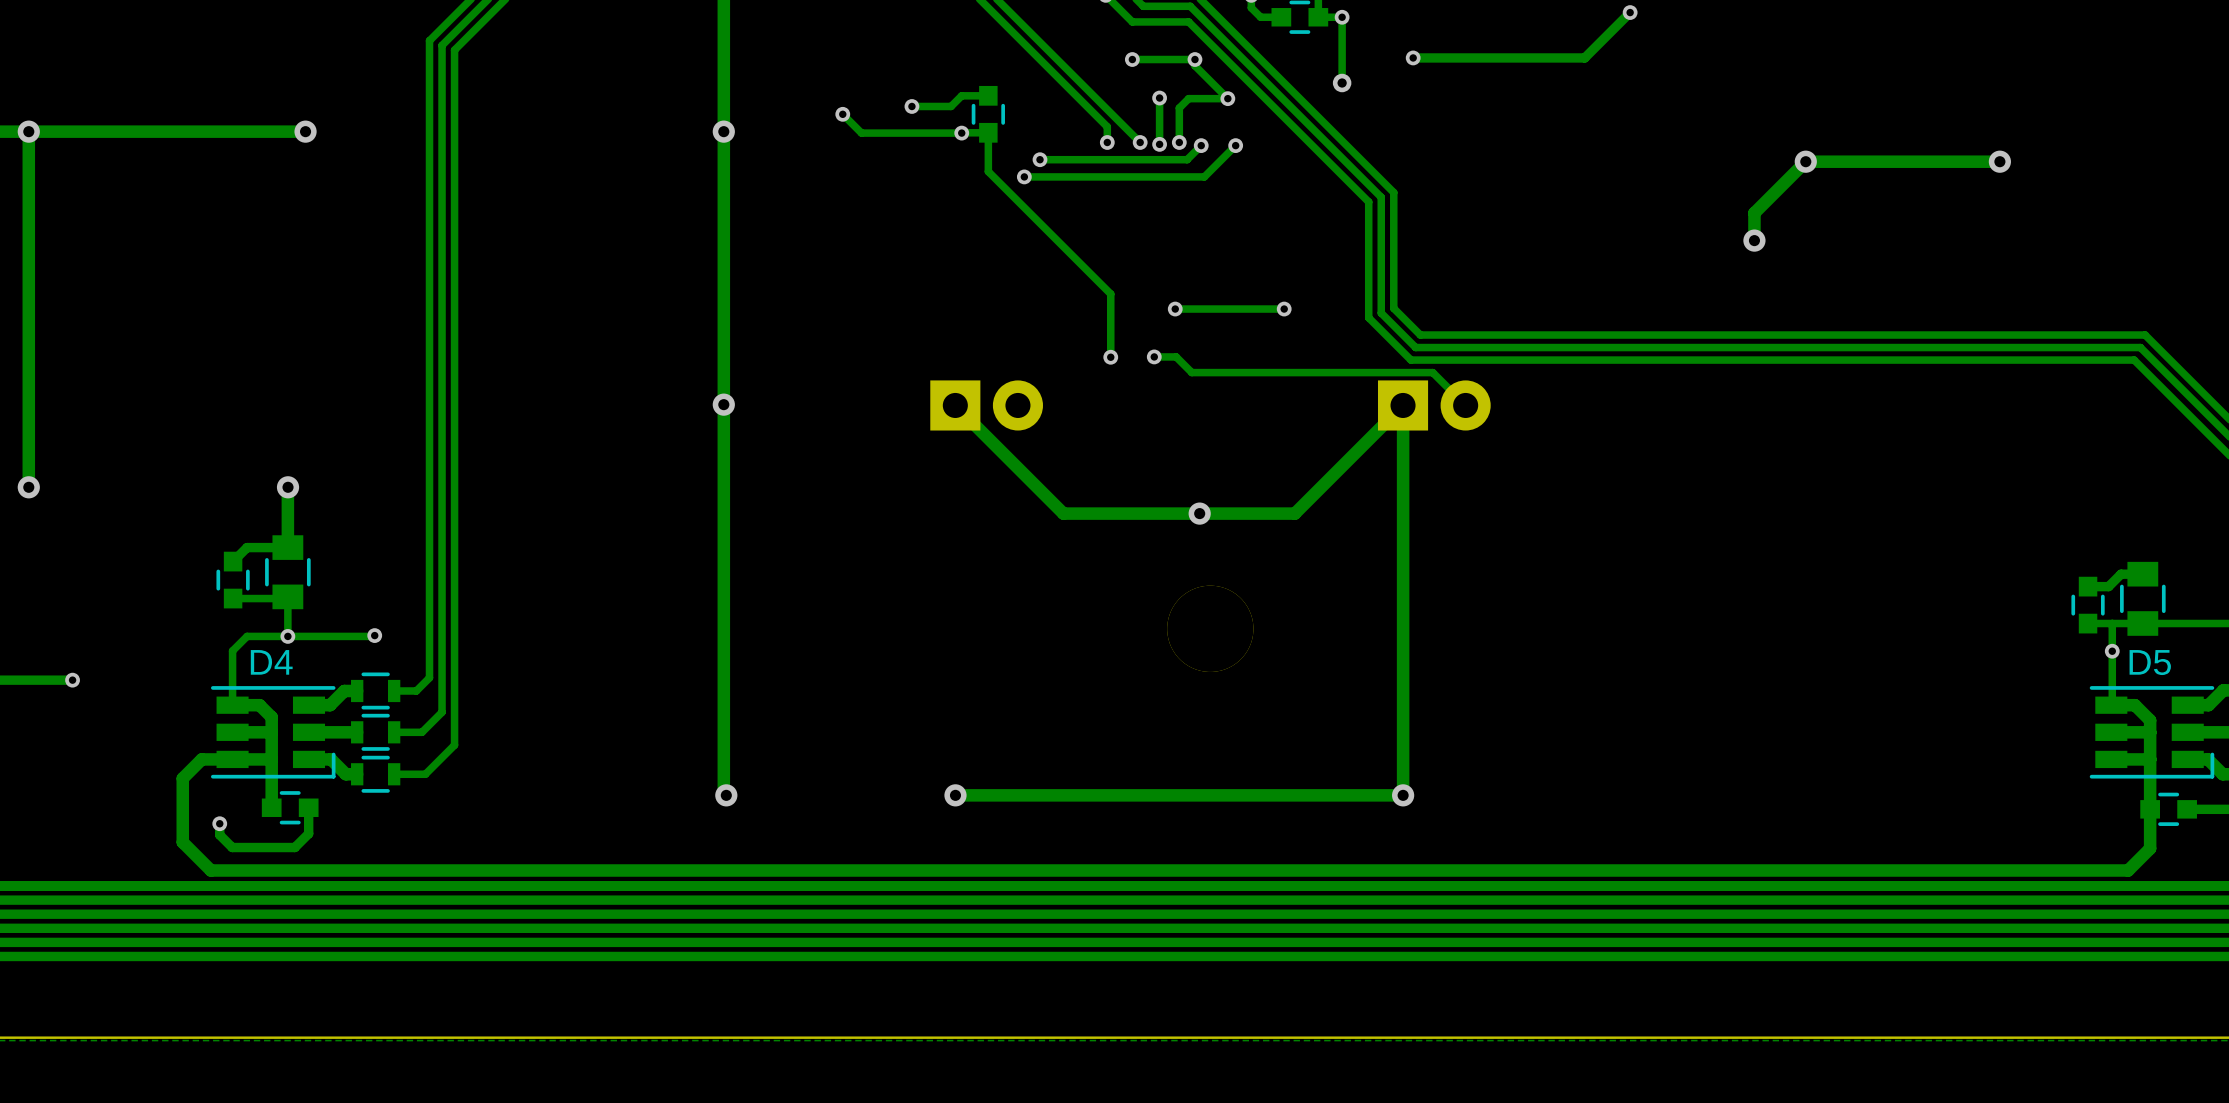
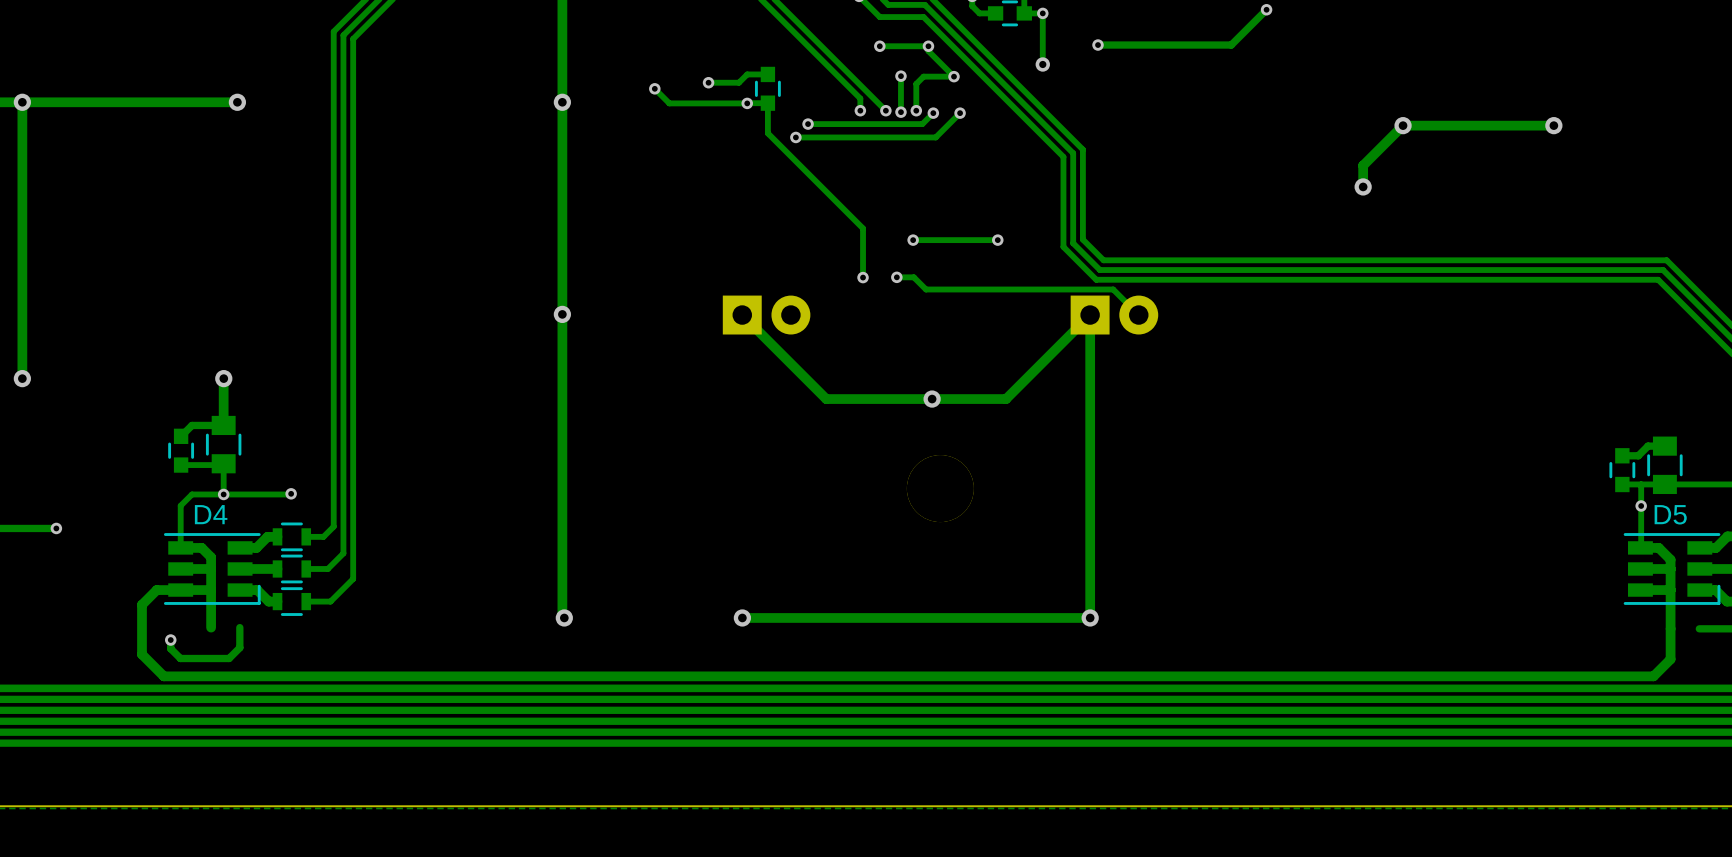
part: (290, 807) -> none
part: (2168, 809) -> none

